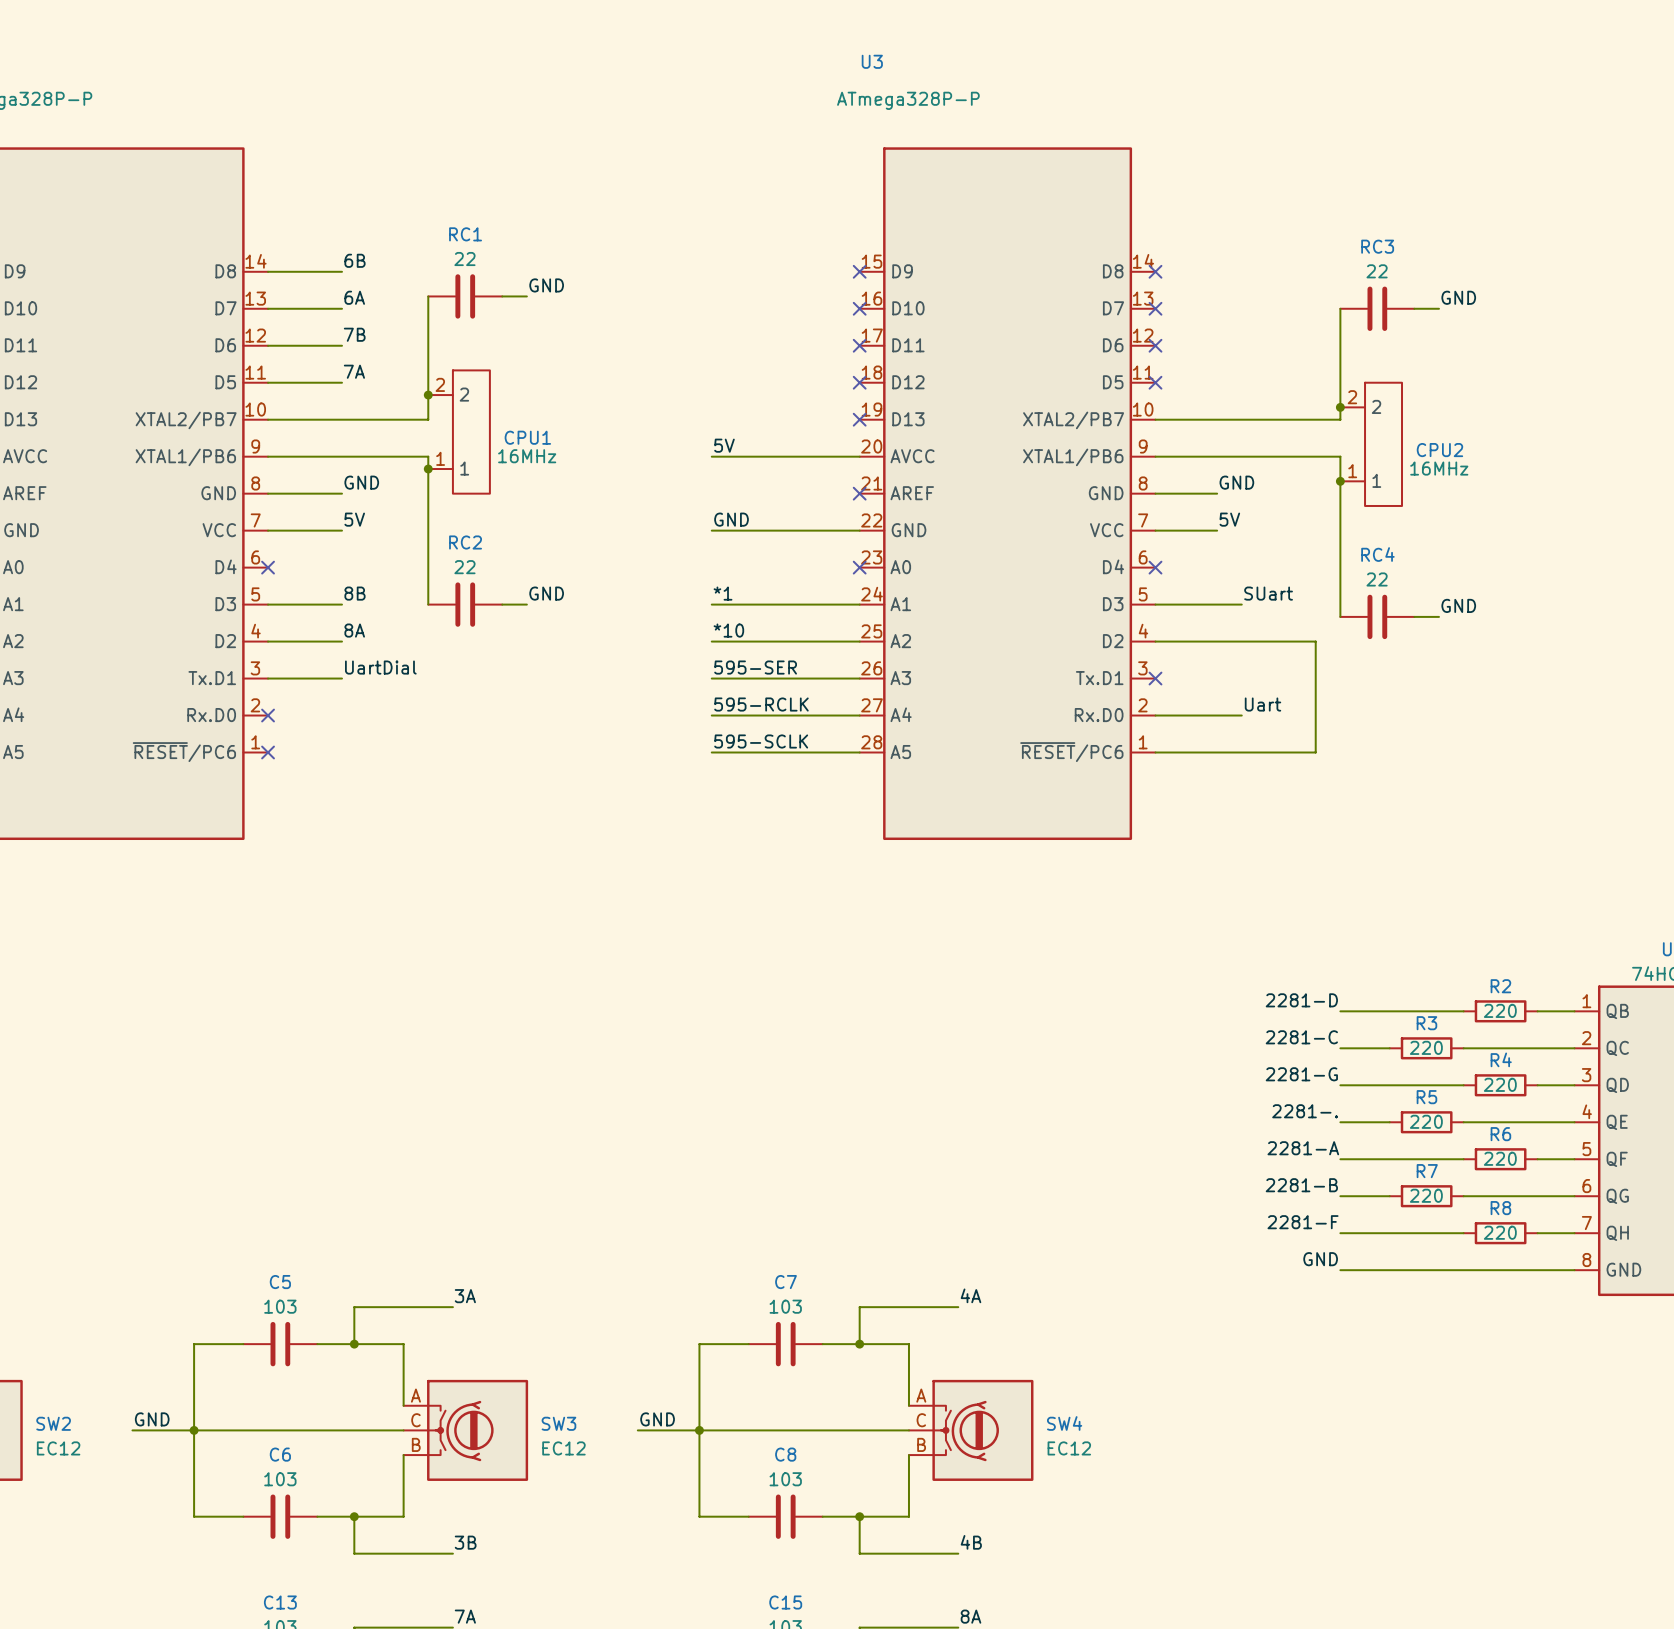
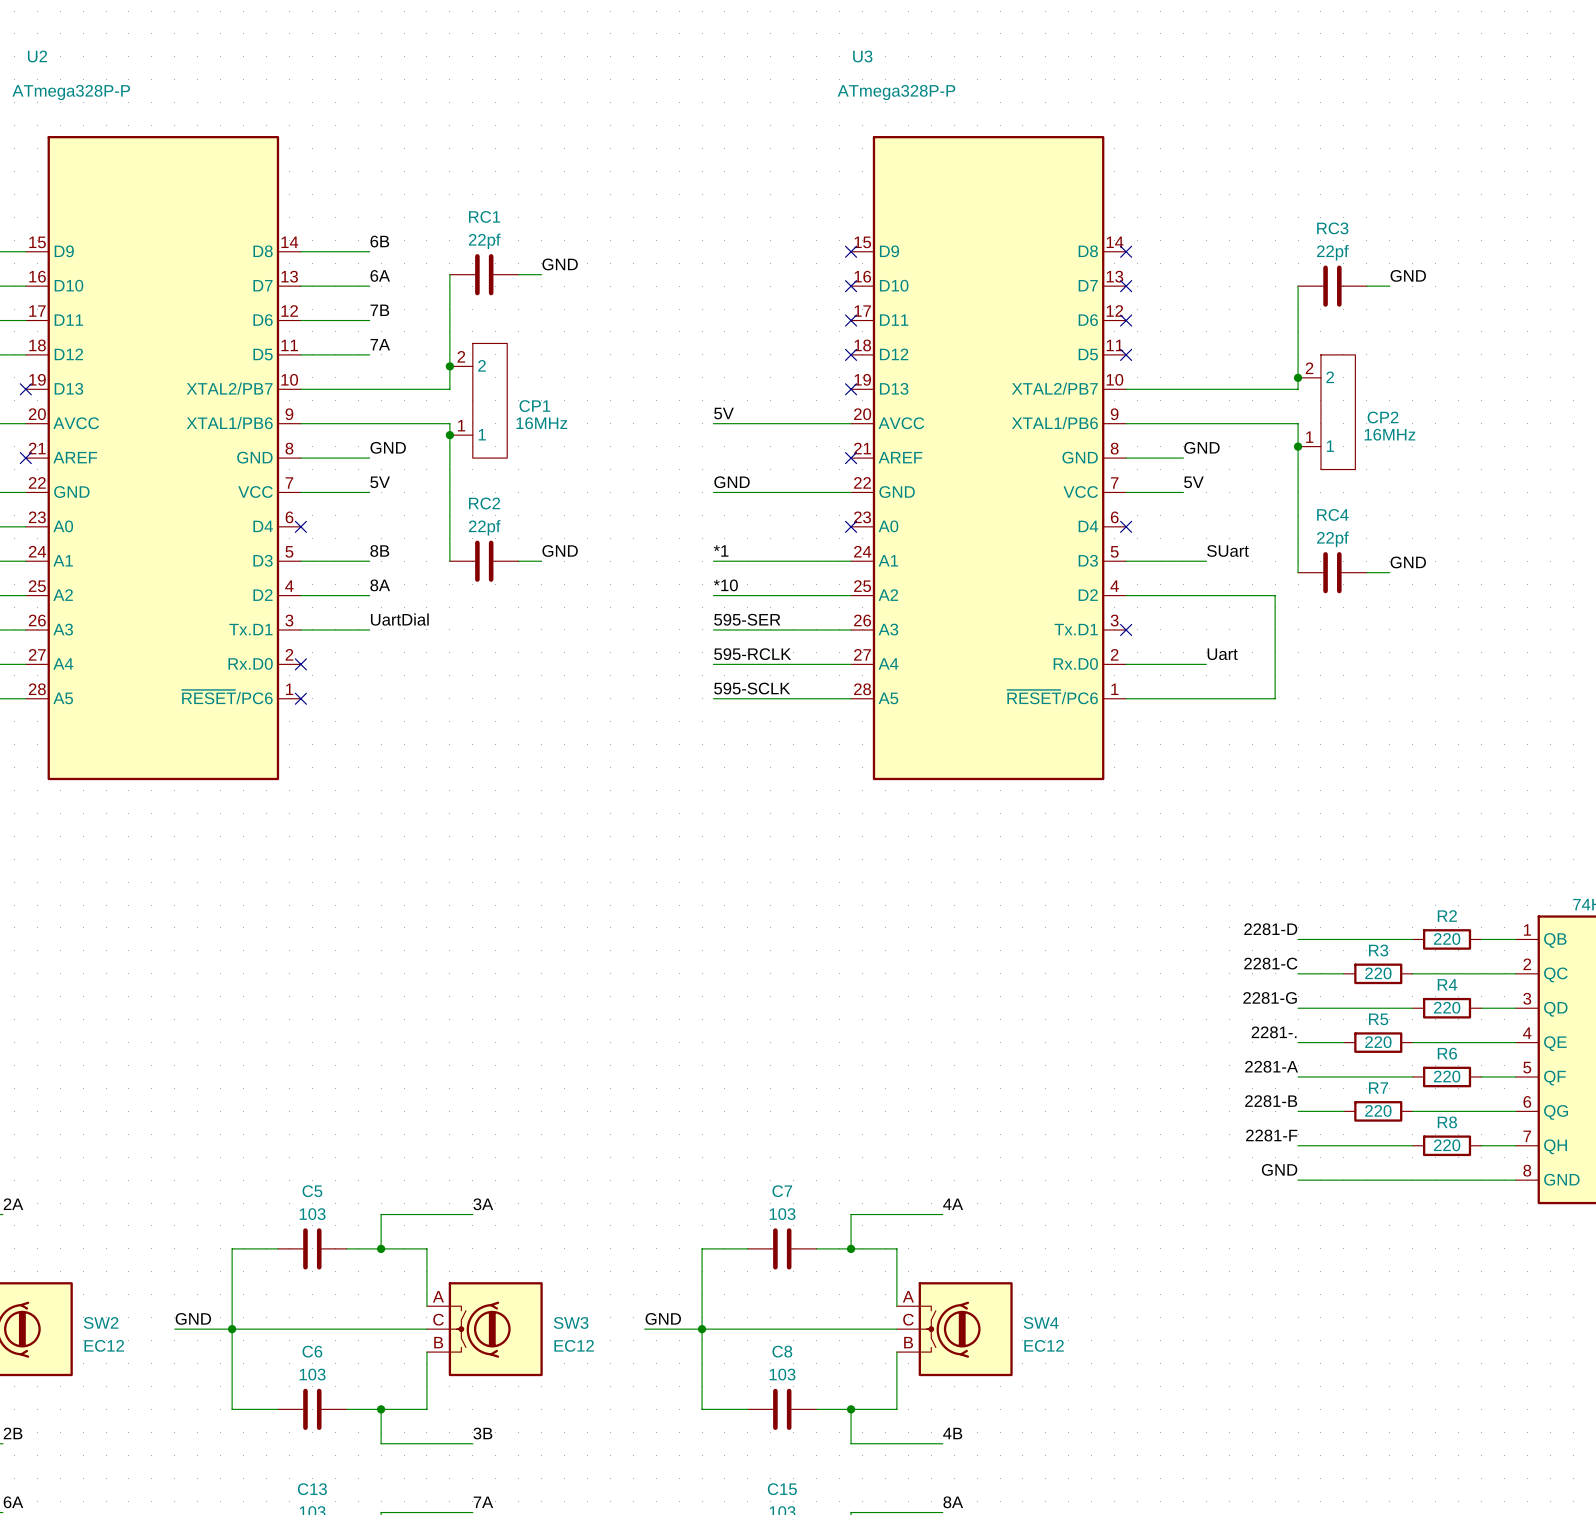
RC1 value: 22 (464, 259) -> 22pf (484, 241)
RC3 value: 22 (1377, 271) -> 22pf (1332, 252)
CPU1 name: CPU1 (527, 437) -> CP1 (534, 406)
CPU2 name: CPU2 (1439, 450) -> CP2 (1383, 417)
RC2 value: 22 (464, 567) -> 22pf (484, 527)
RC4 value: 22 (1377, 579) -> 22pf (1332, 539)

